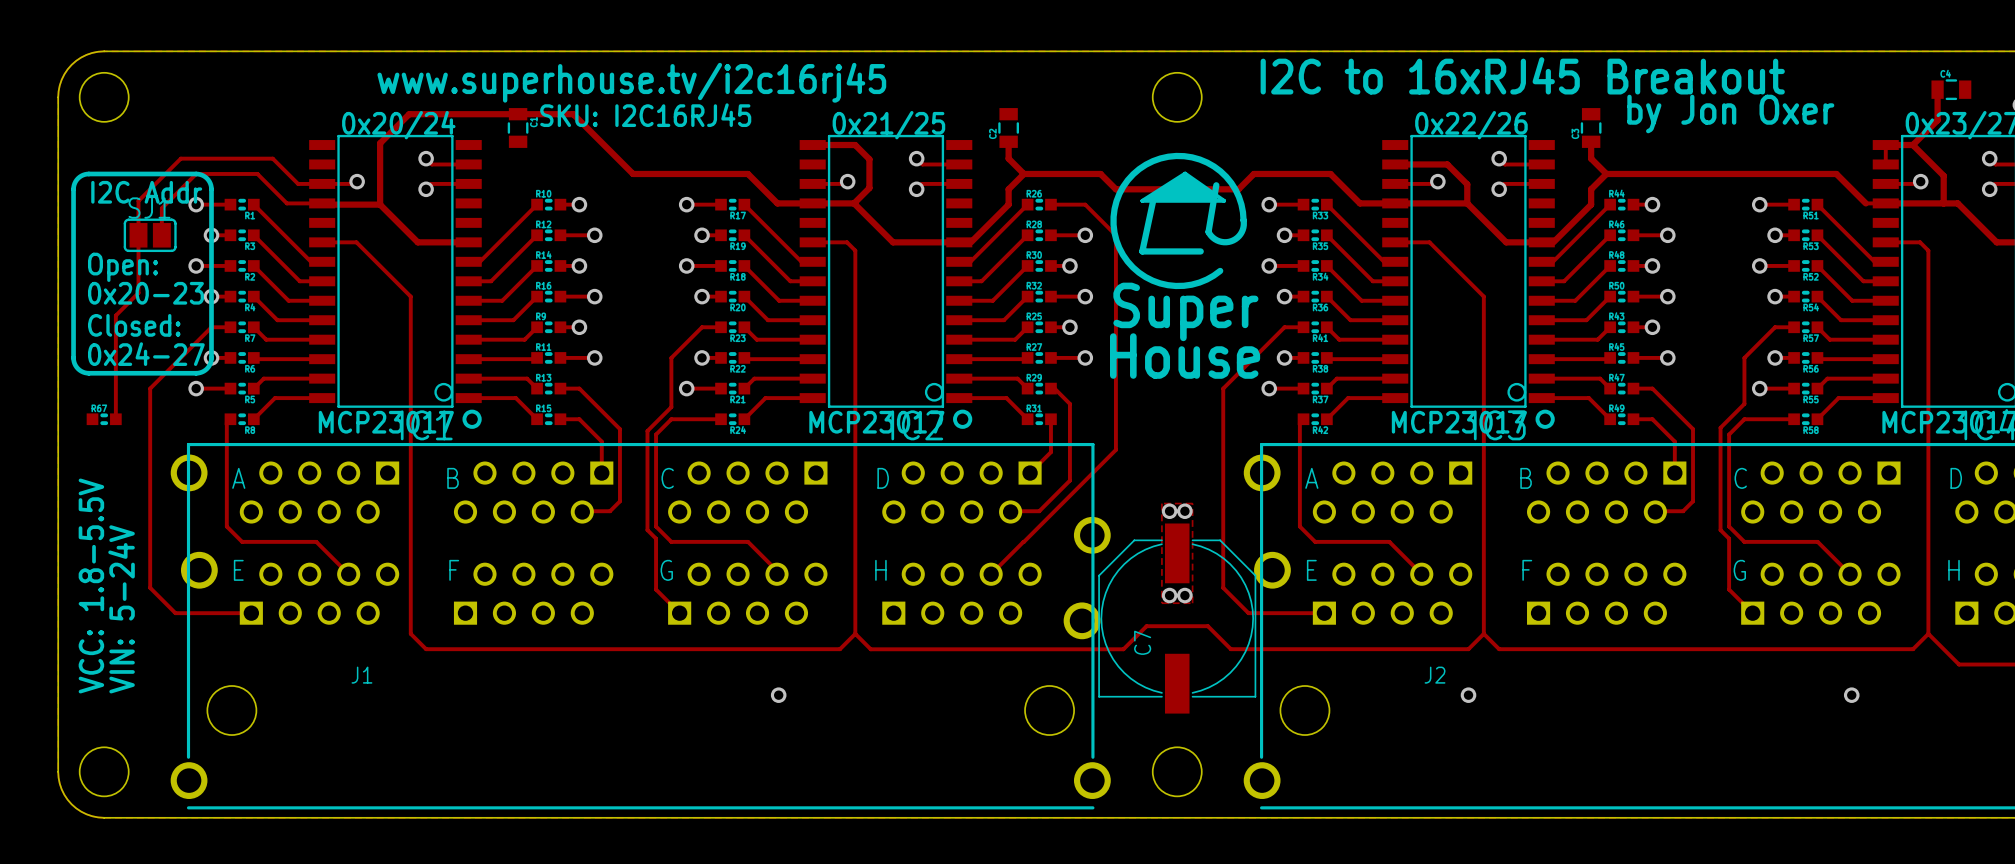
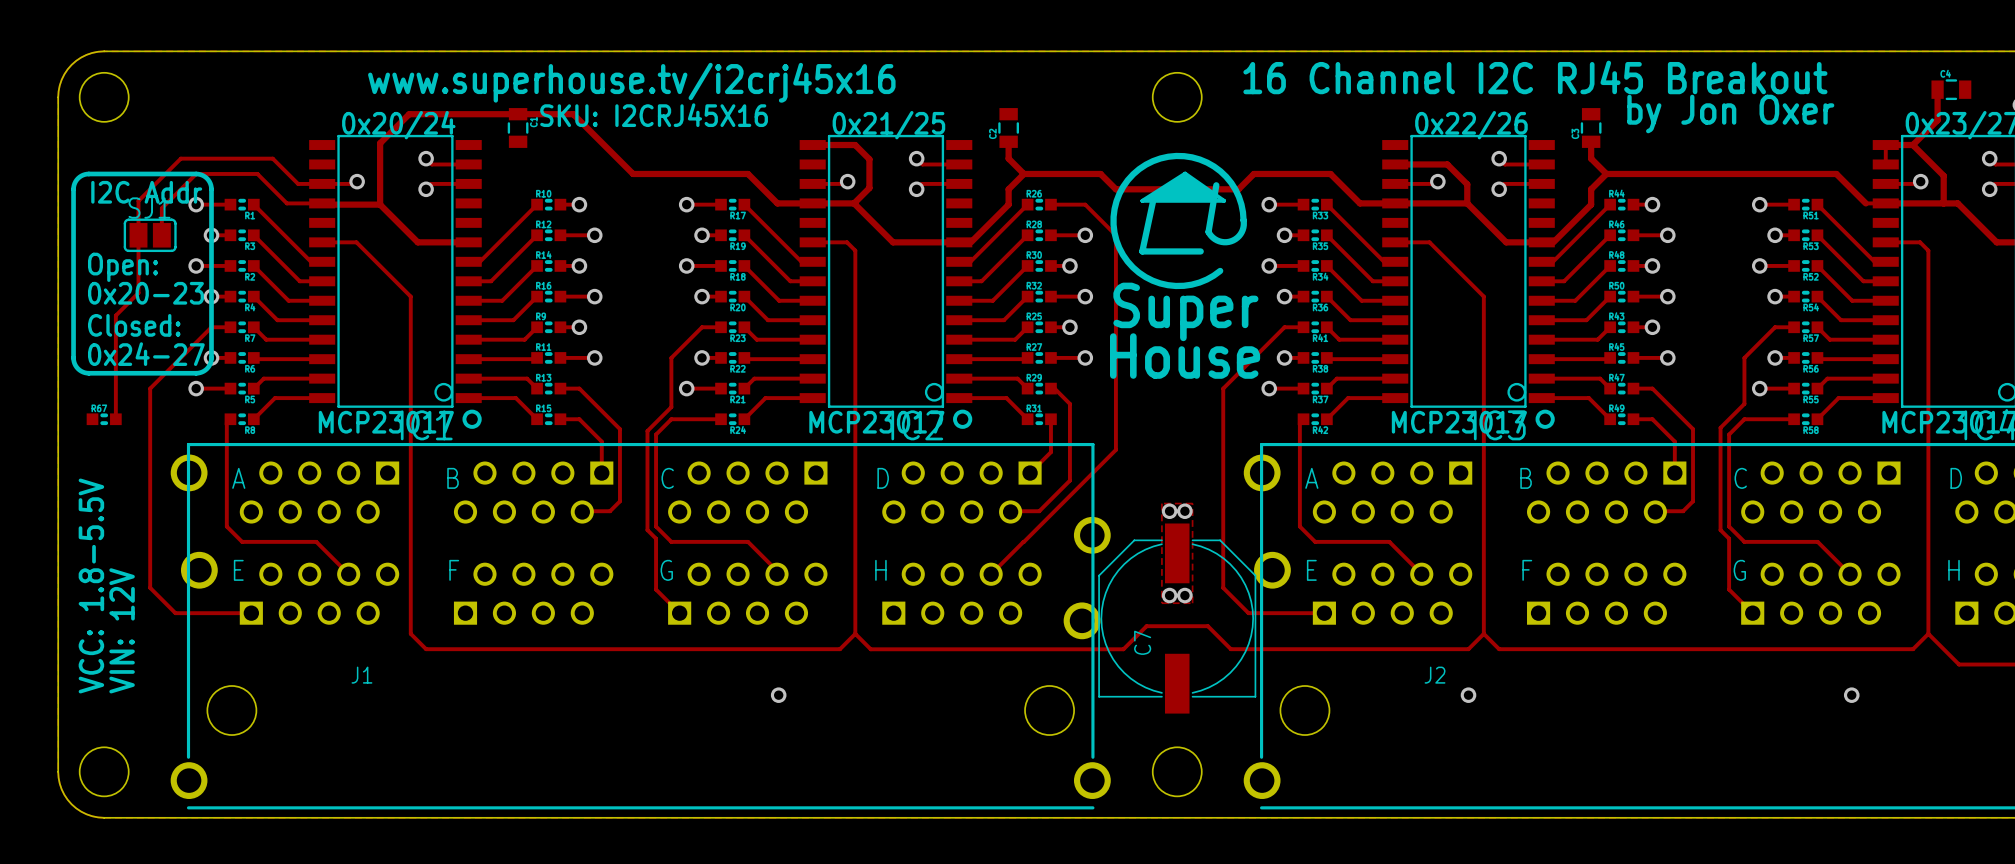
text: I2C to 16xRJ45 Breakout (1522, 75) -> 16 Channel I2C RJ45 Breakout (1535, 77)
text: www.superhouse.tv/i2c16rj45 (631, 82) -> www.superhouse.tv/i2crj45x16 (631, 82)
text: SKU: I2C16RJ45 (645, 115) -> SKU: I2CRJ45X16 (654, 115)
text: VIN: 5-24V (121, 609) -> VIN: 12V (122, 630)

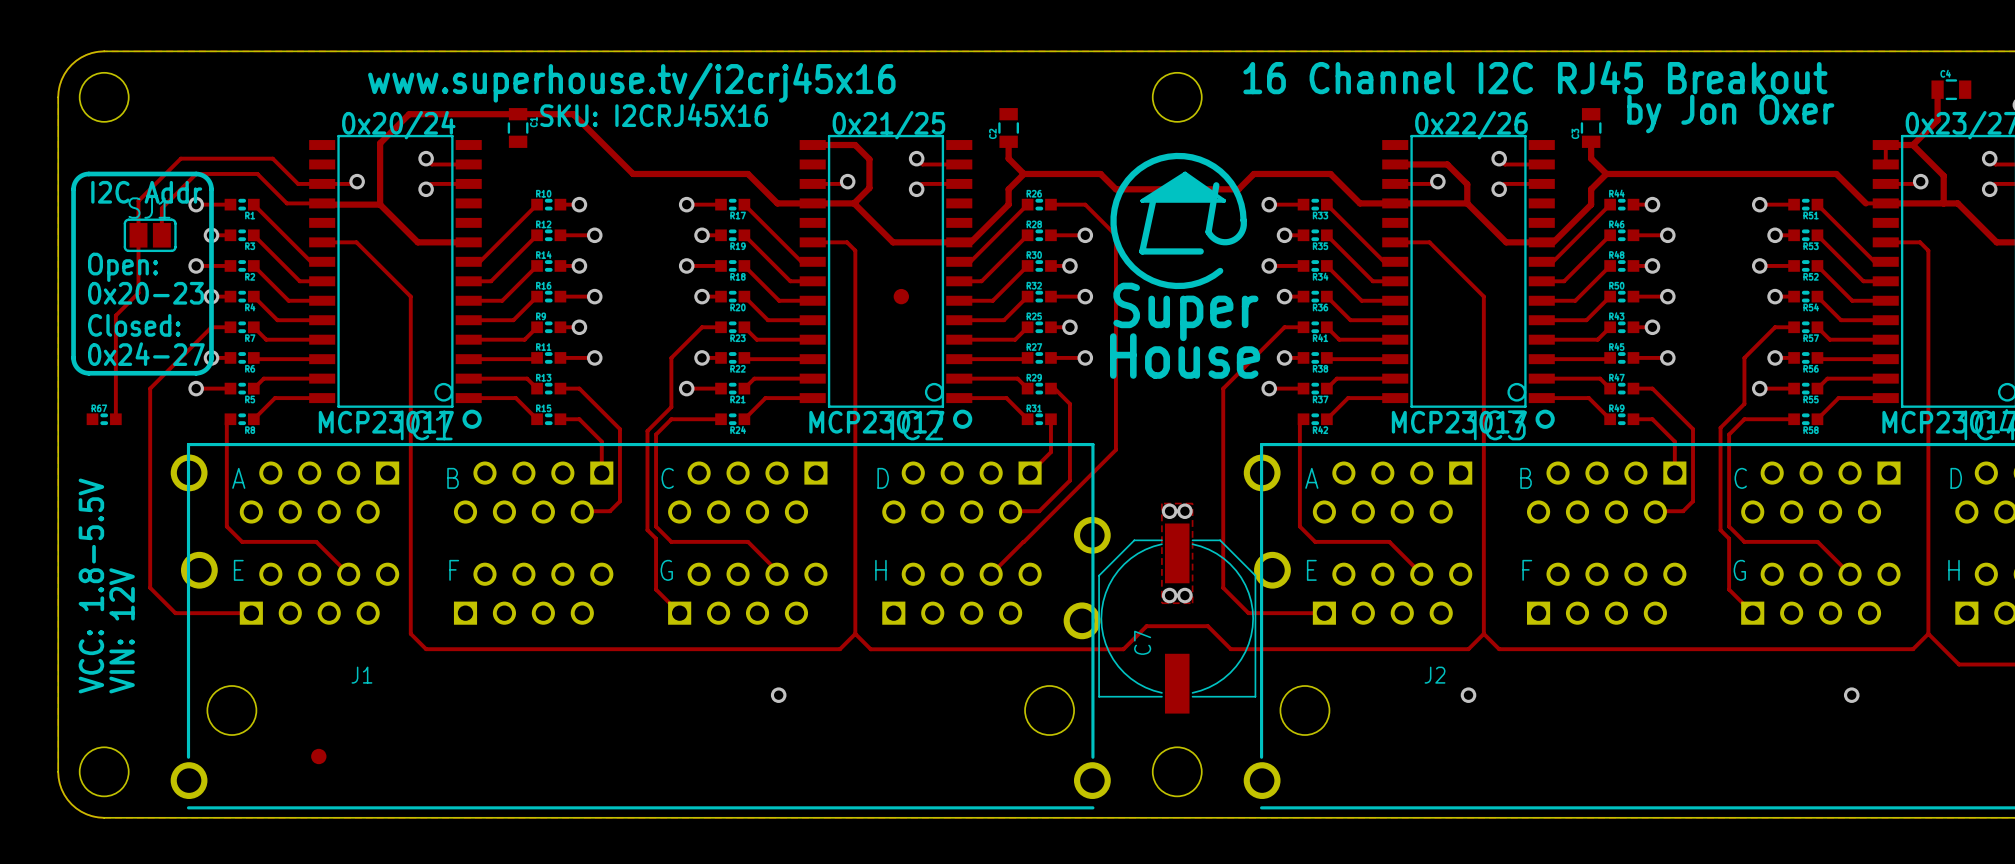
part: none -> (901, 296)
part: none -> (318, 756)

